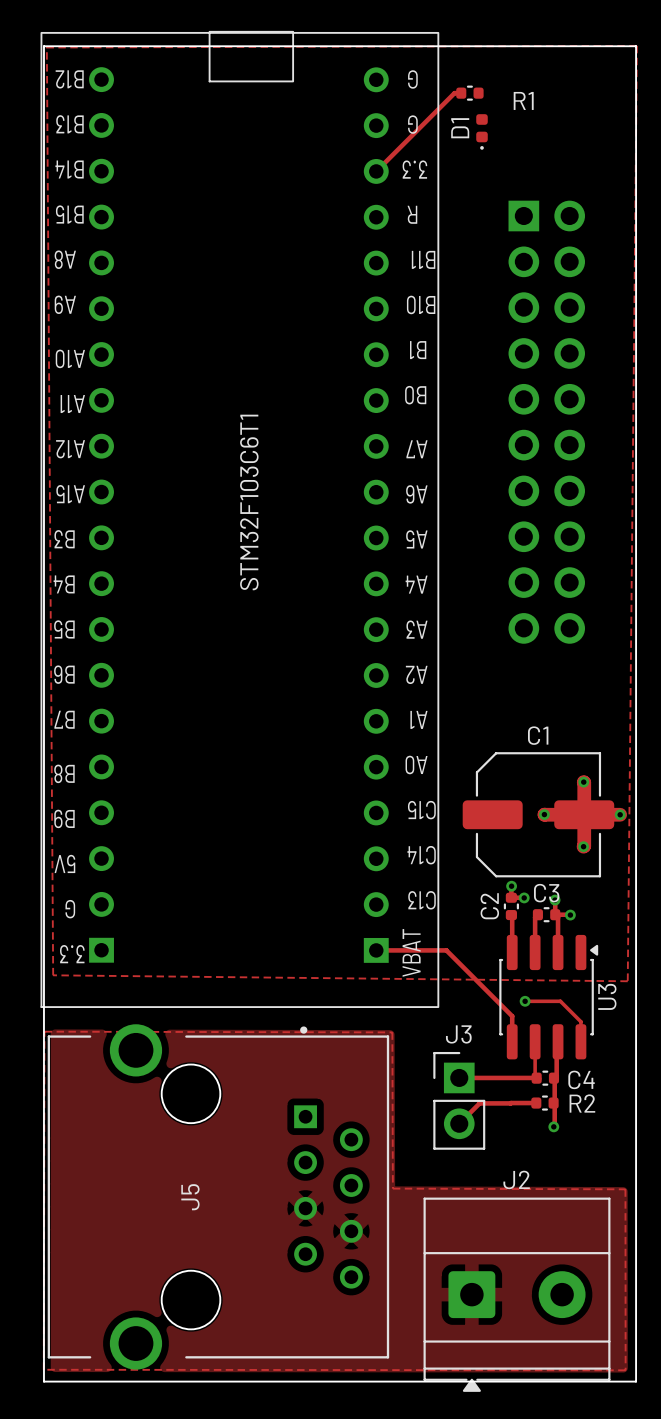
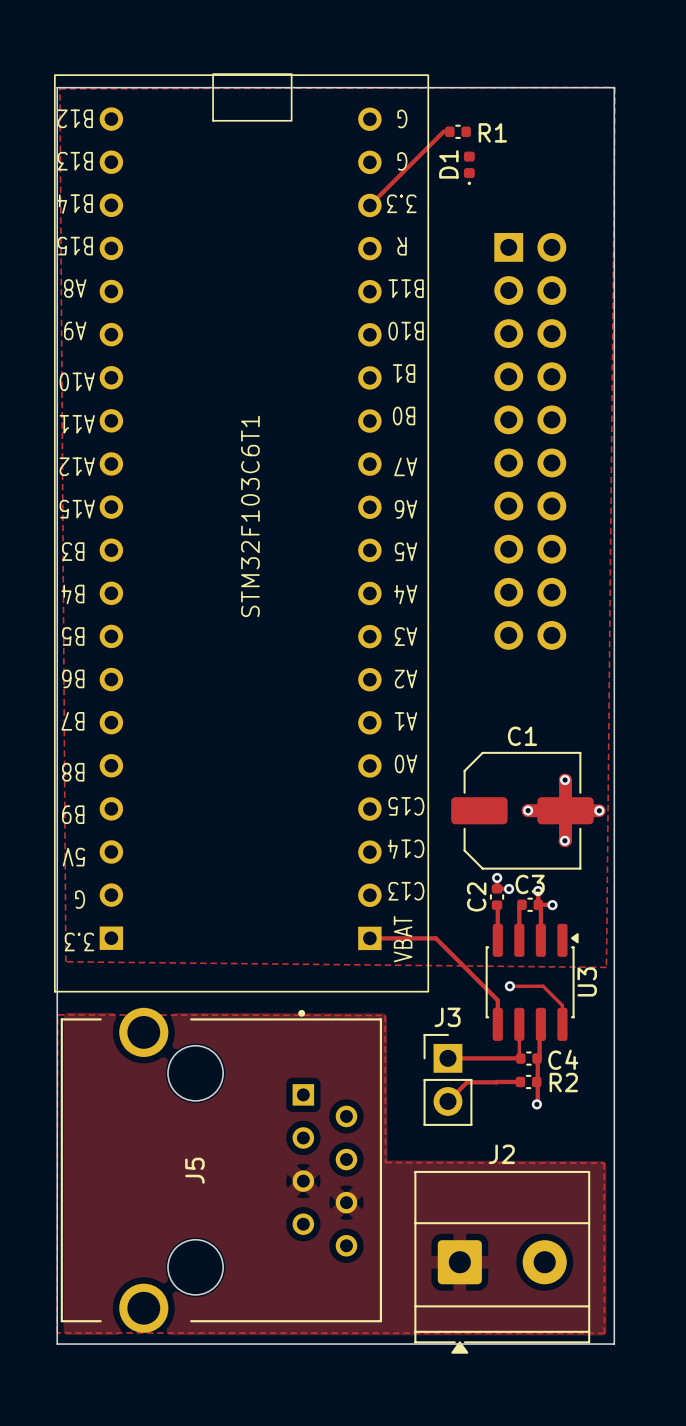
R1 name position: R1 (523, 100) -> R1 (492, 132)

